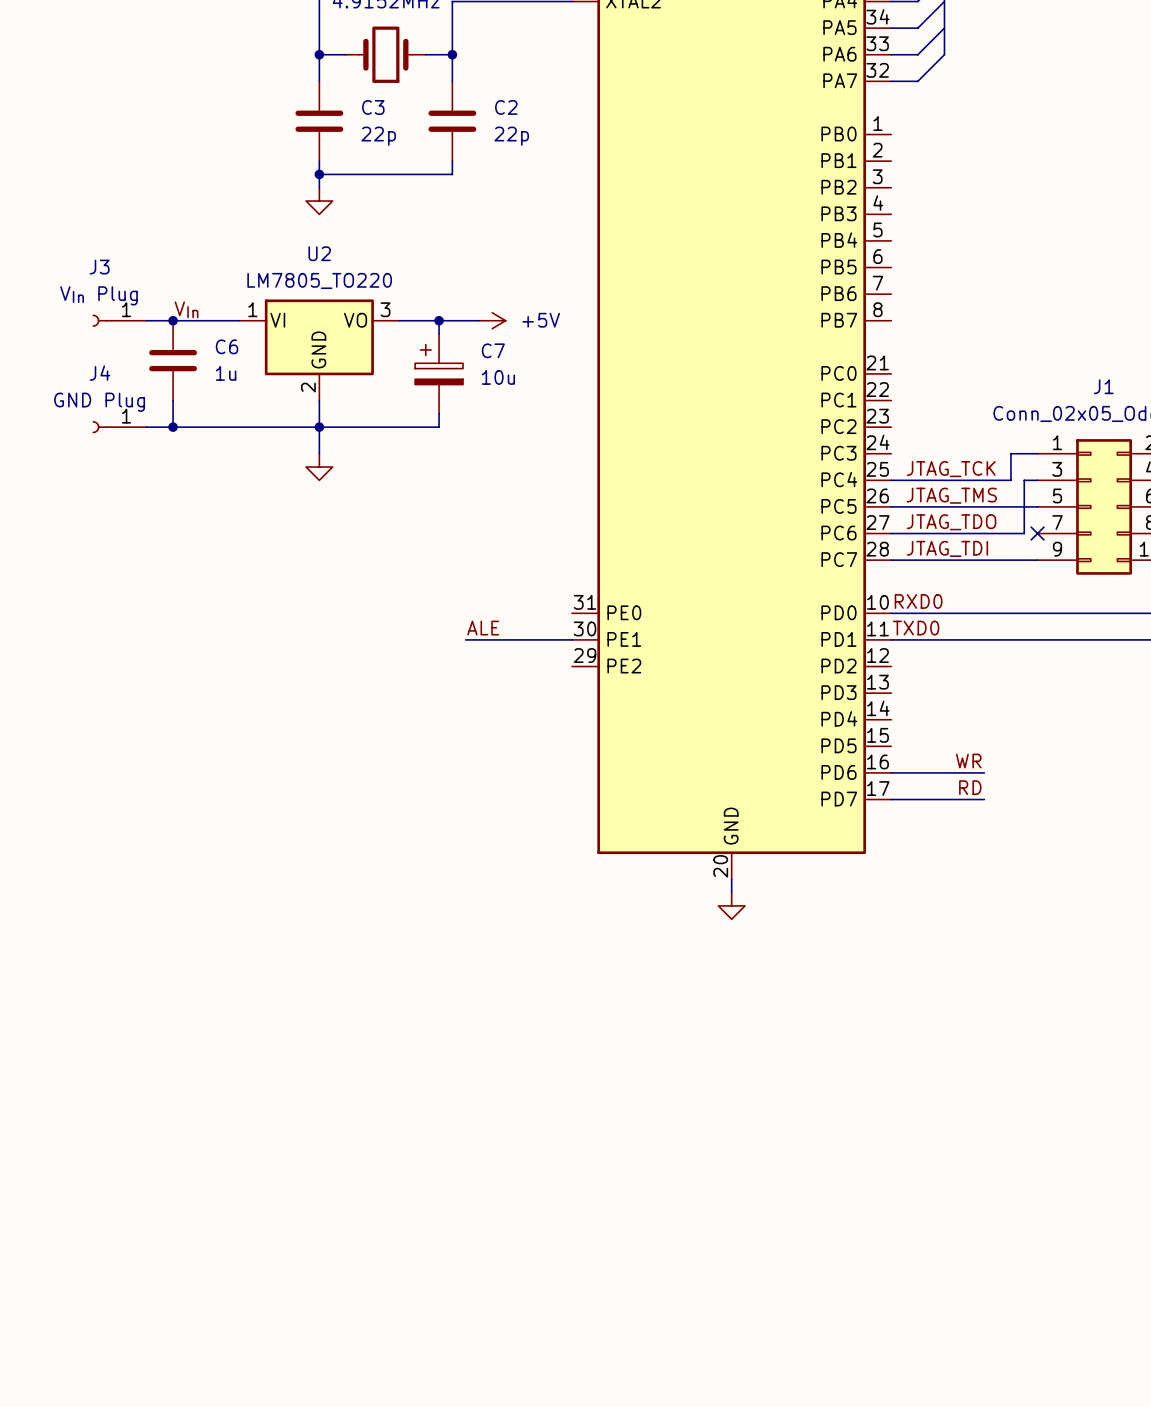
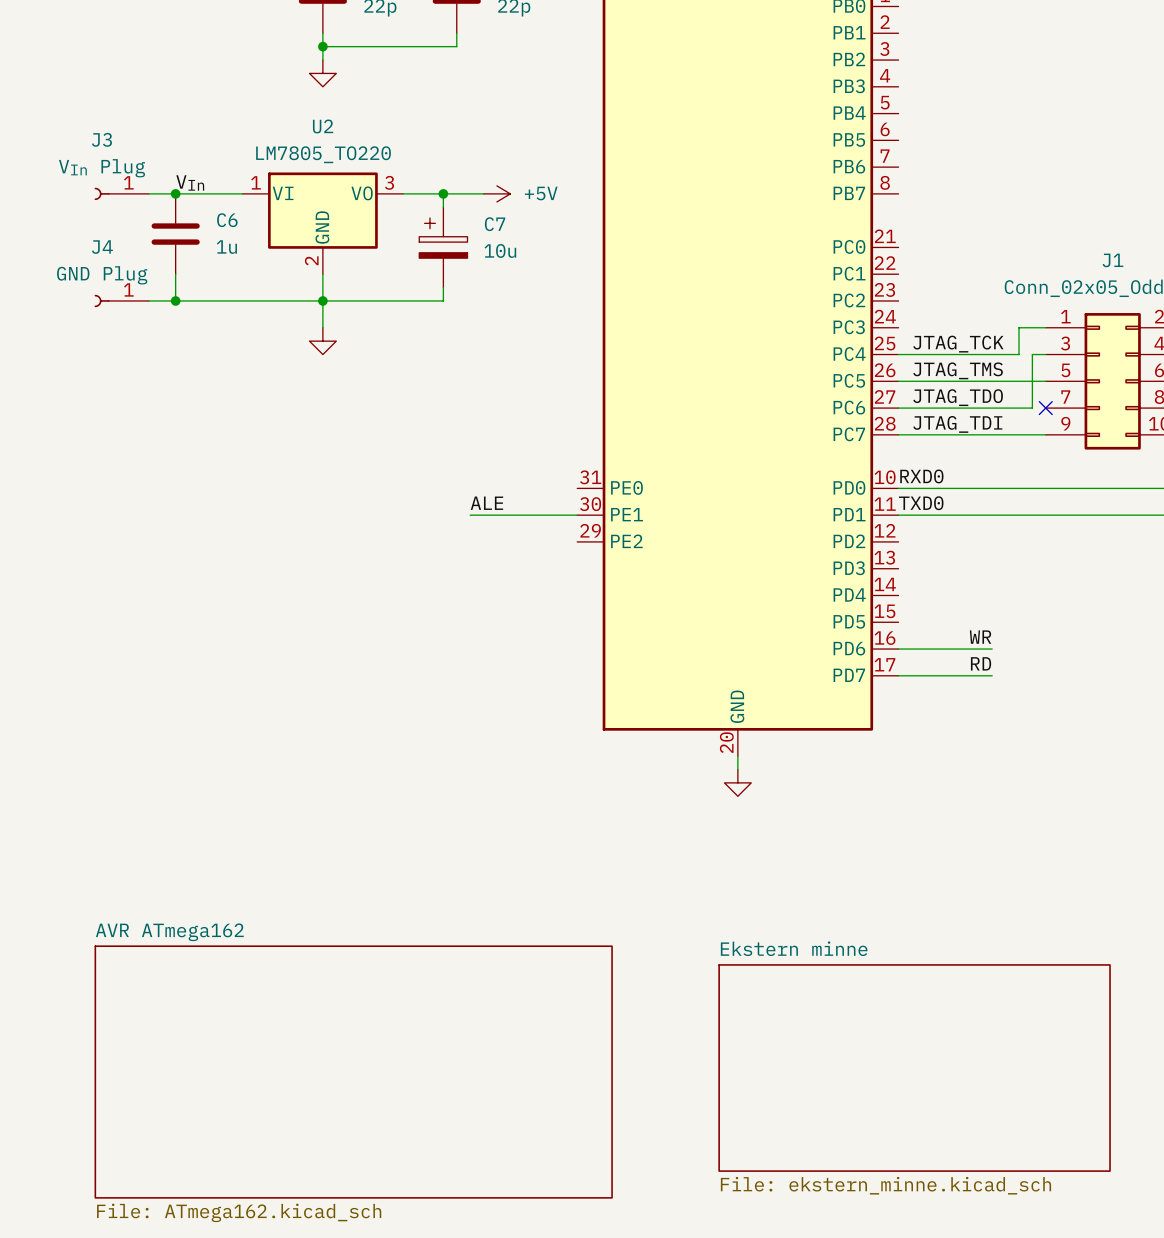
sheet Ekstern minne: none -> File: ekstern_minne.kicad_sch (914, 1068)
sheet AVR ATmega162: none -> File: ATmega162.kicad_sch (353, 1072)

